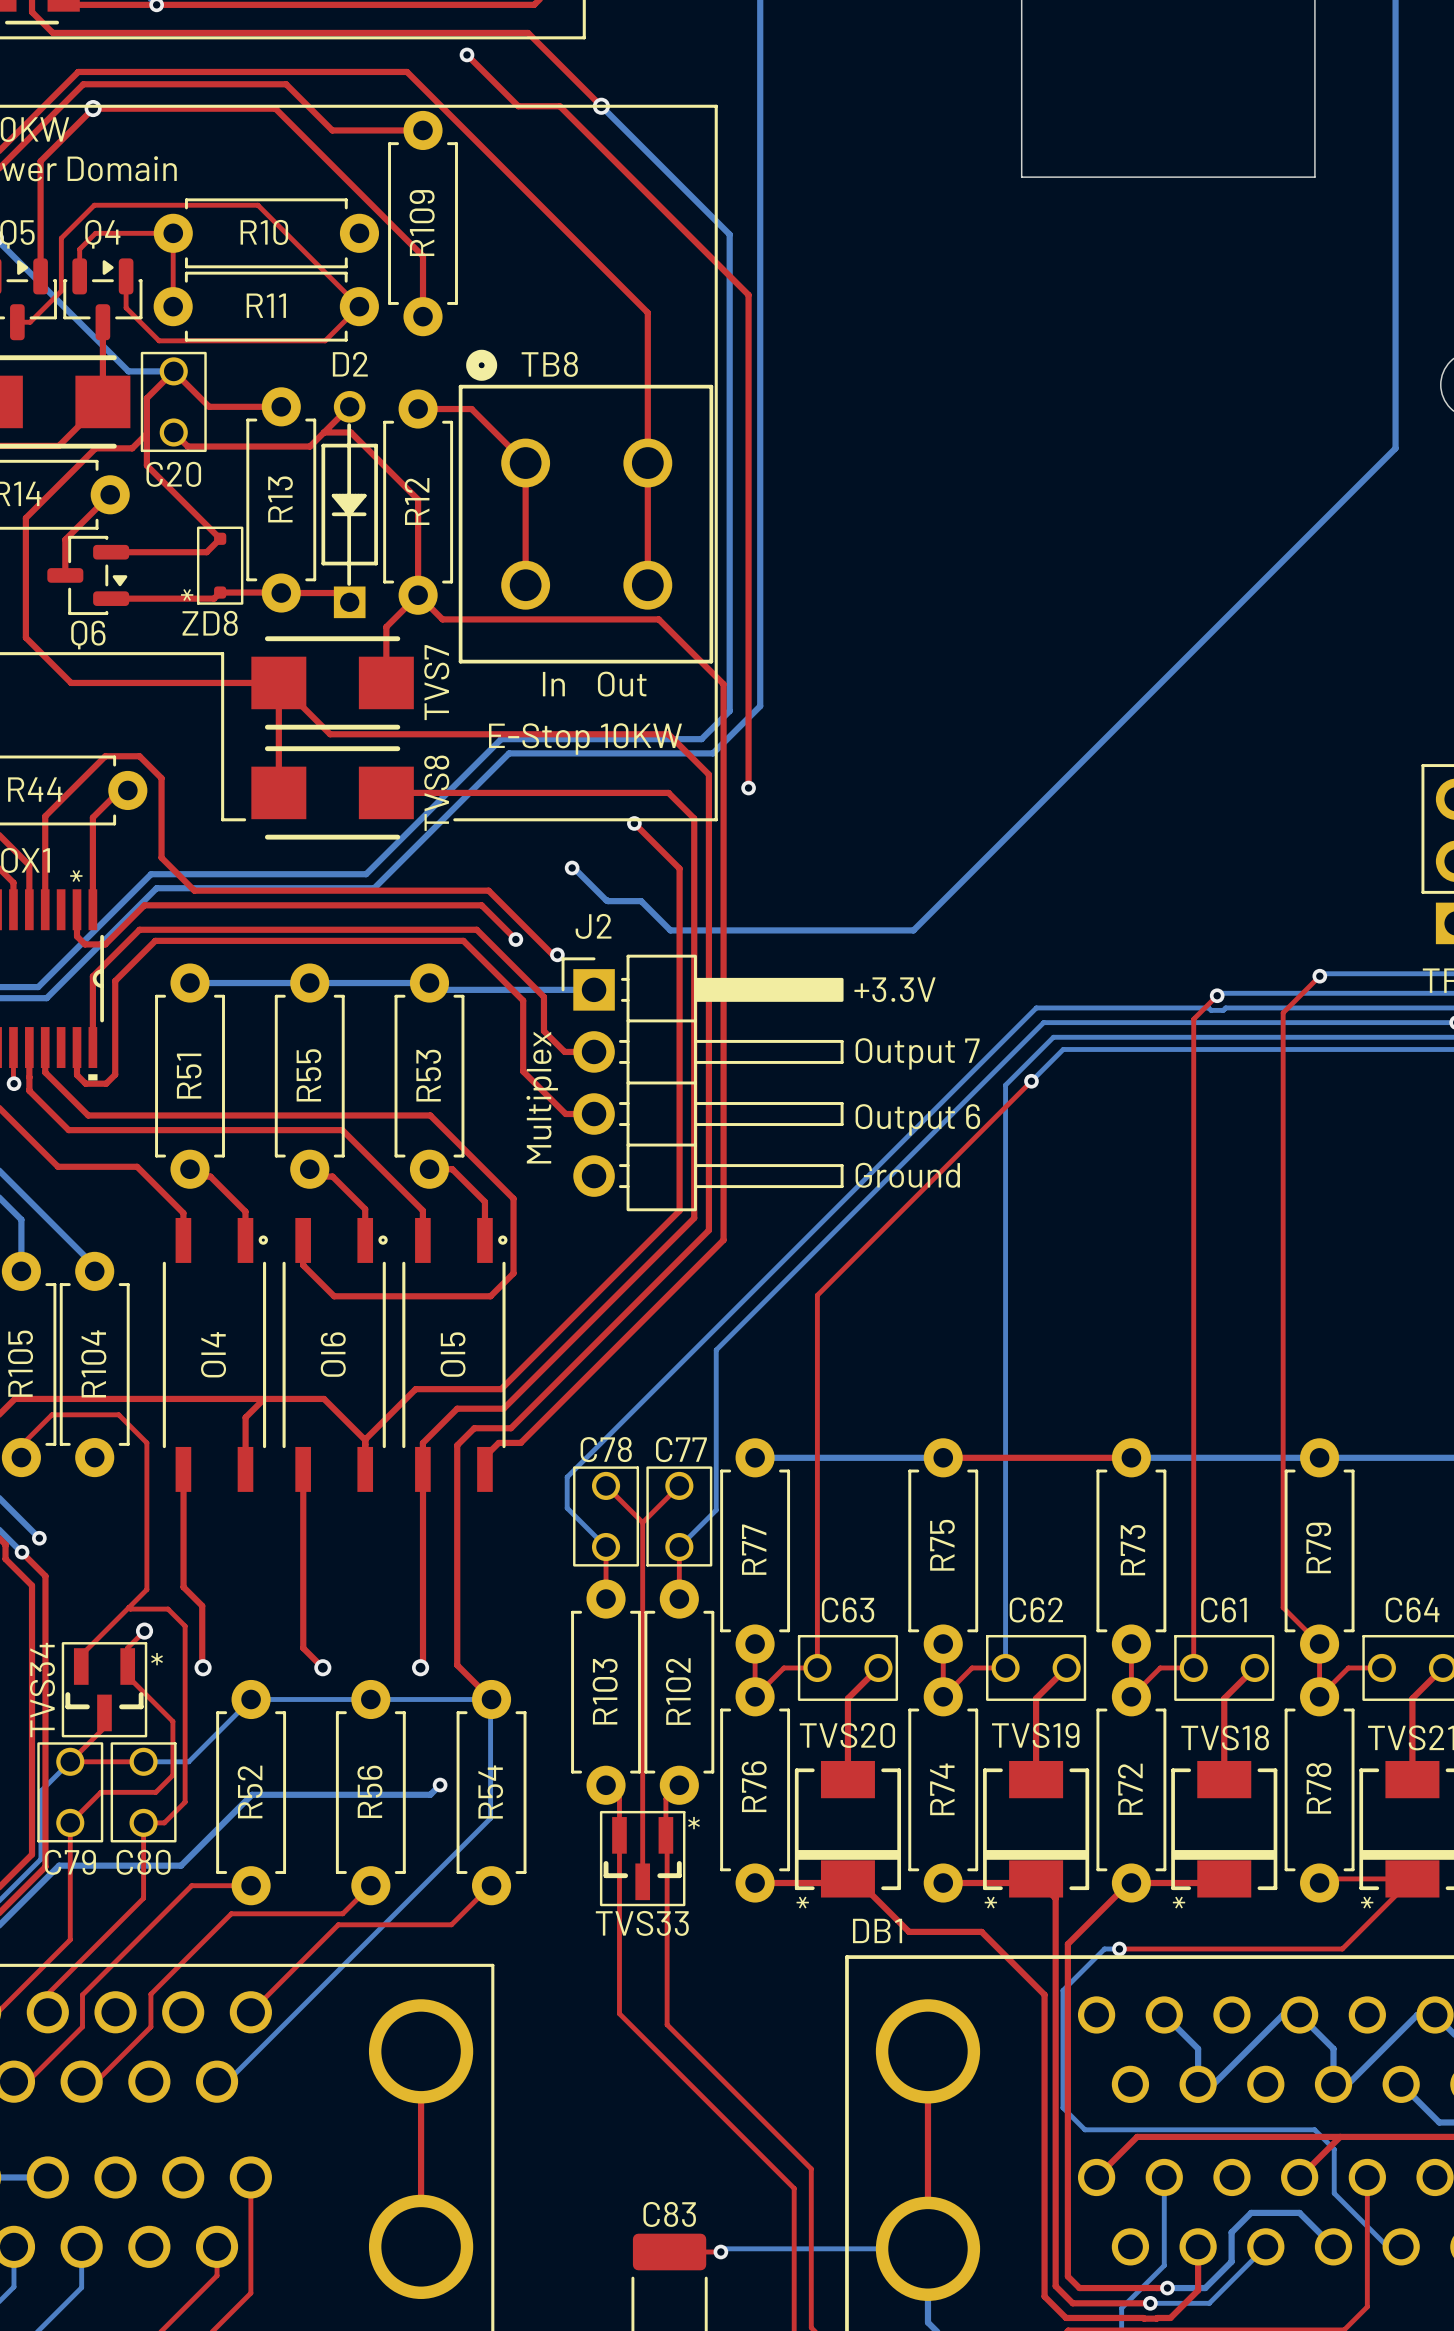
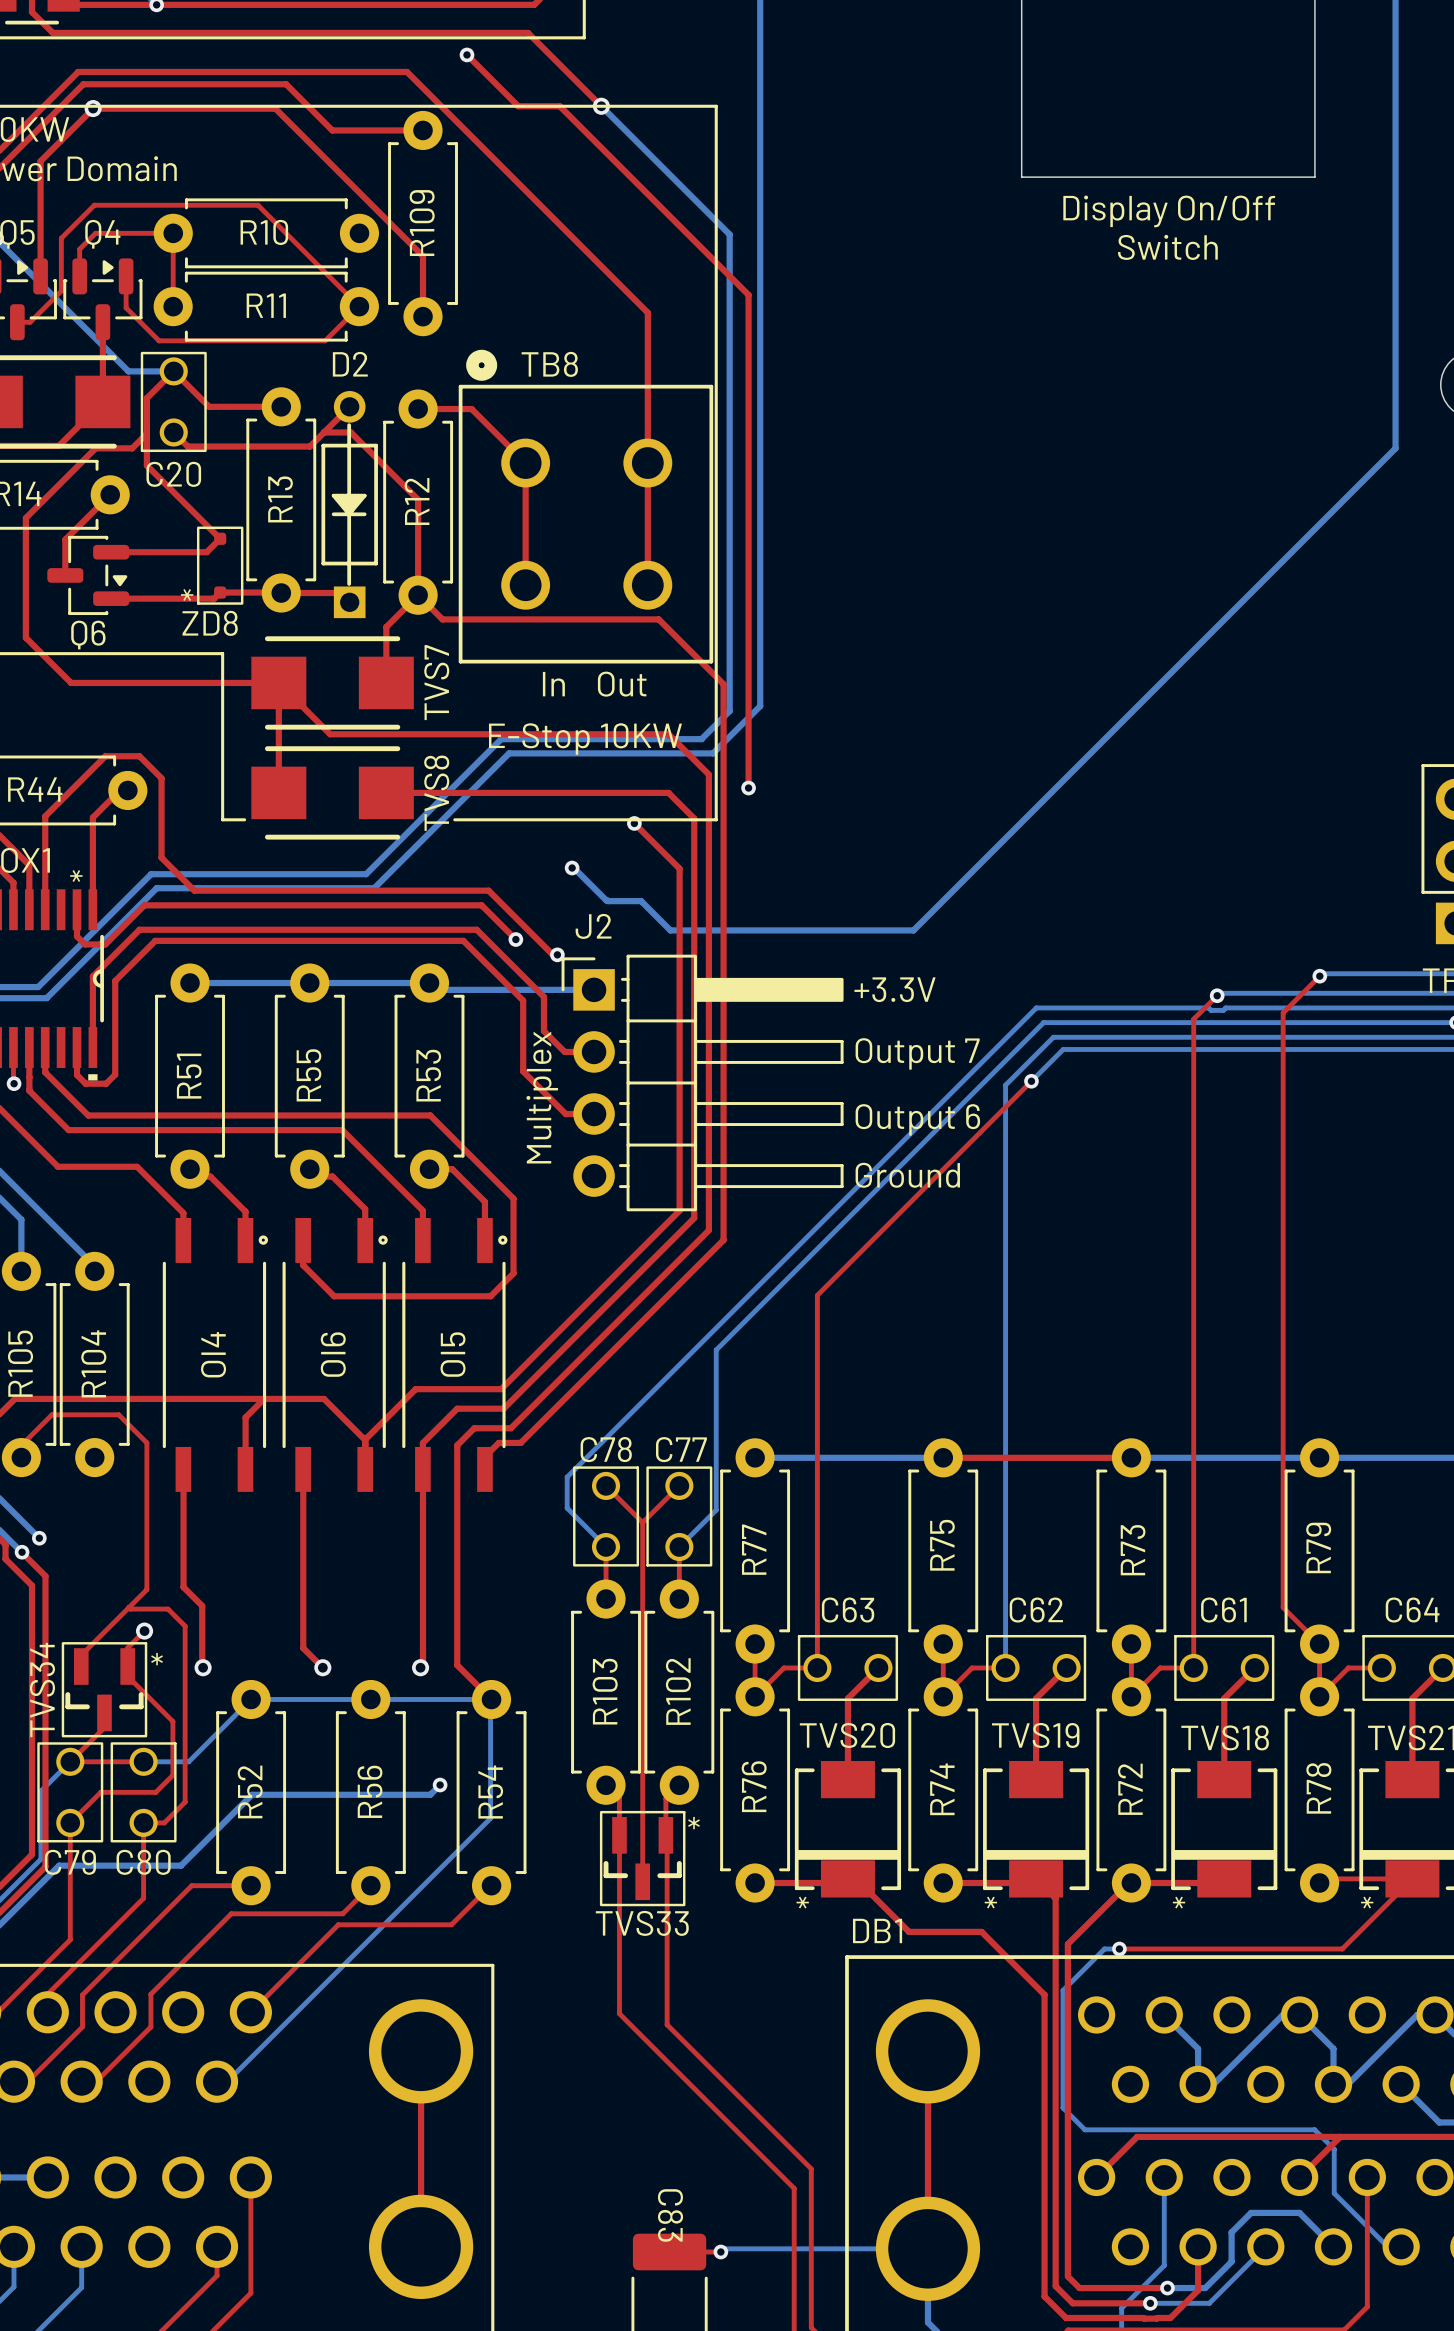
text: none -> Display On/Off (1169, 211)
text: none -> Switch (1167, 247)
C83 name rotation: 0° (669, 2214) -> 90° clockwise (670, 2215)

